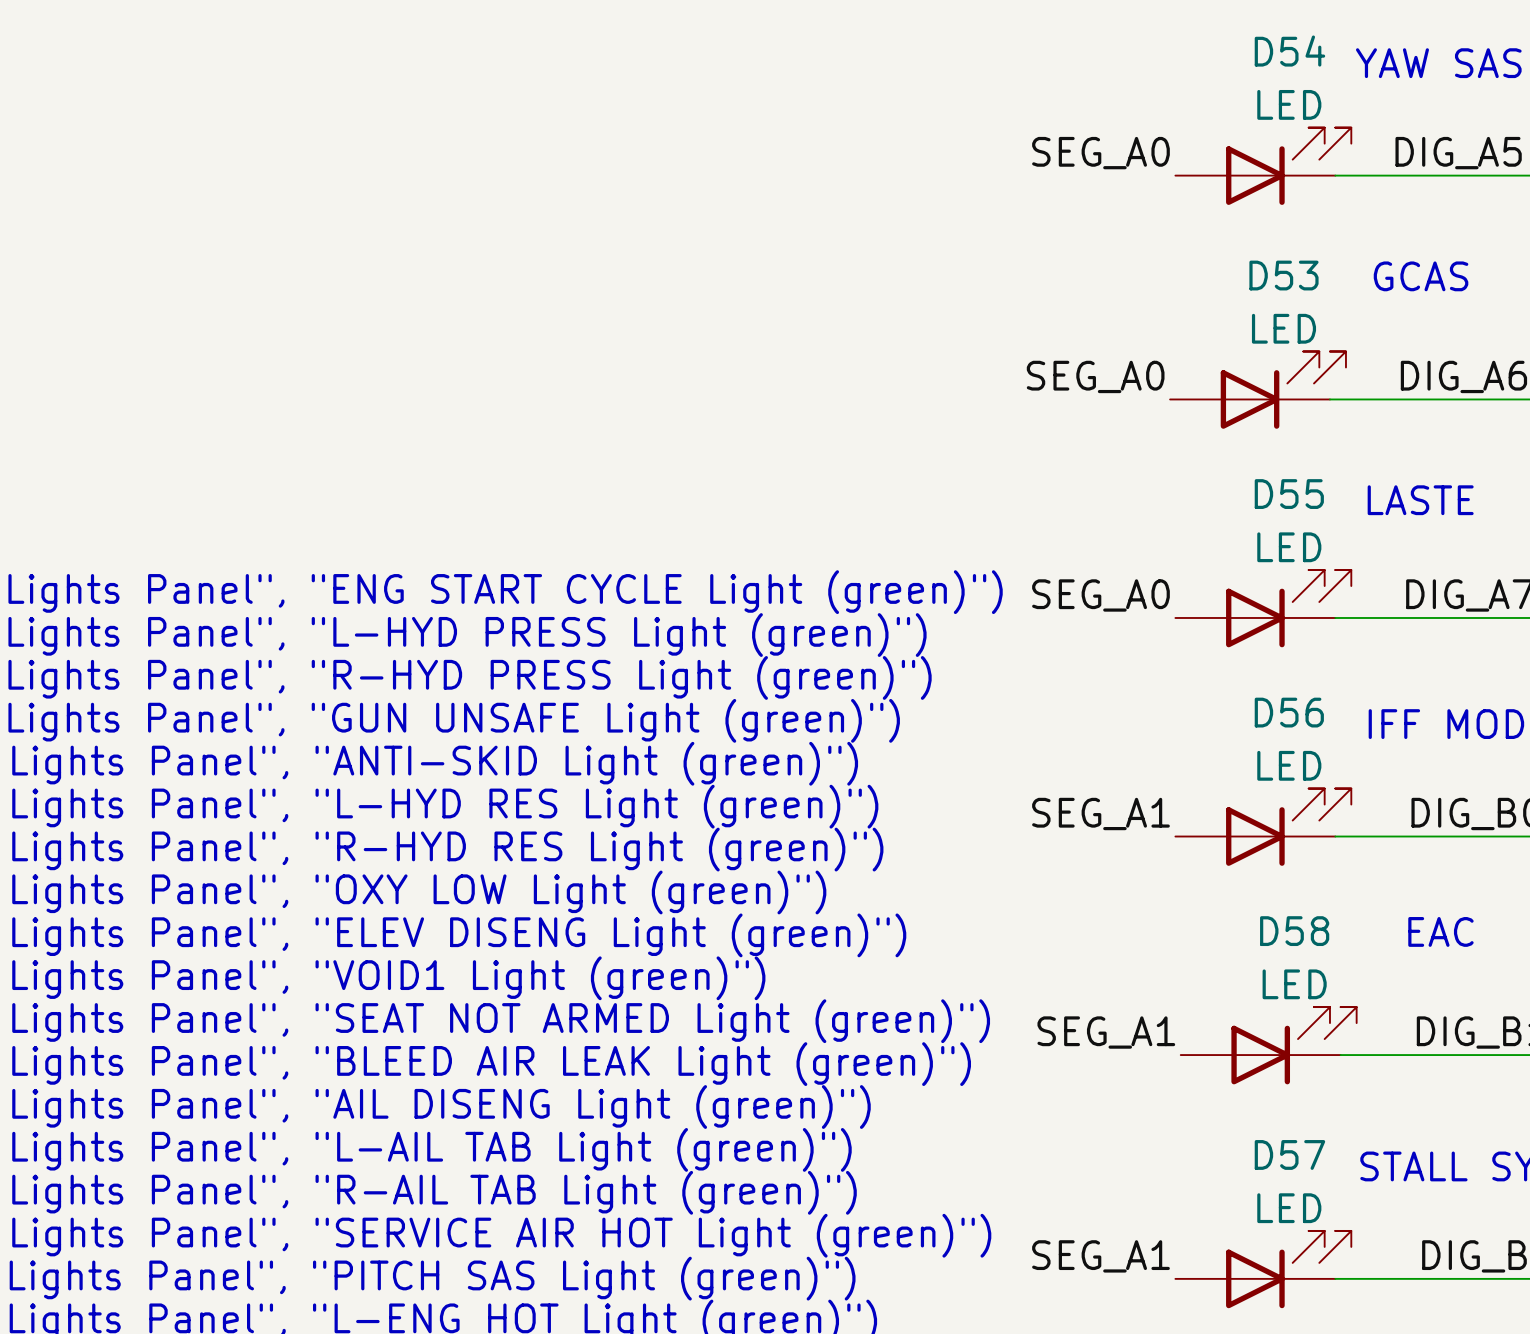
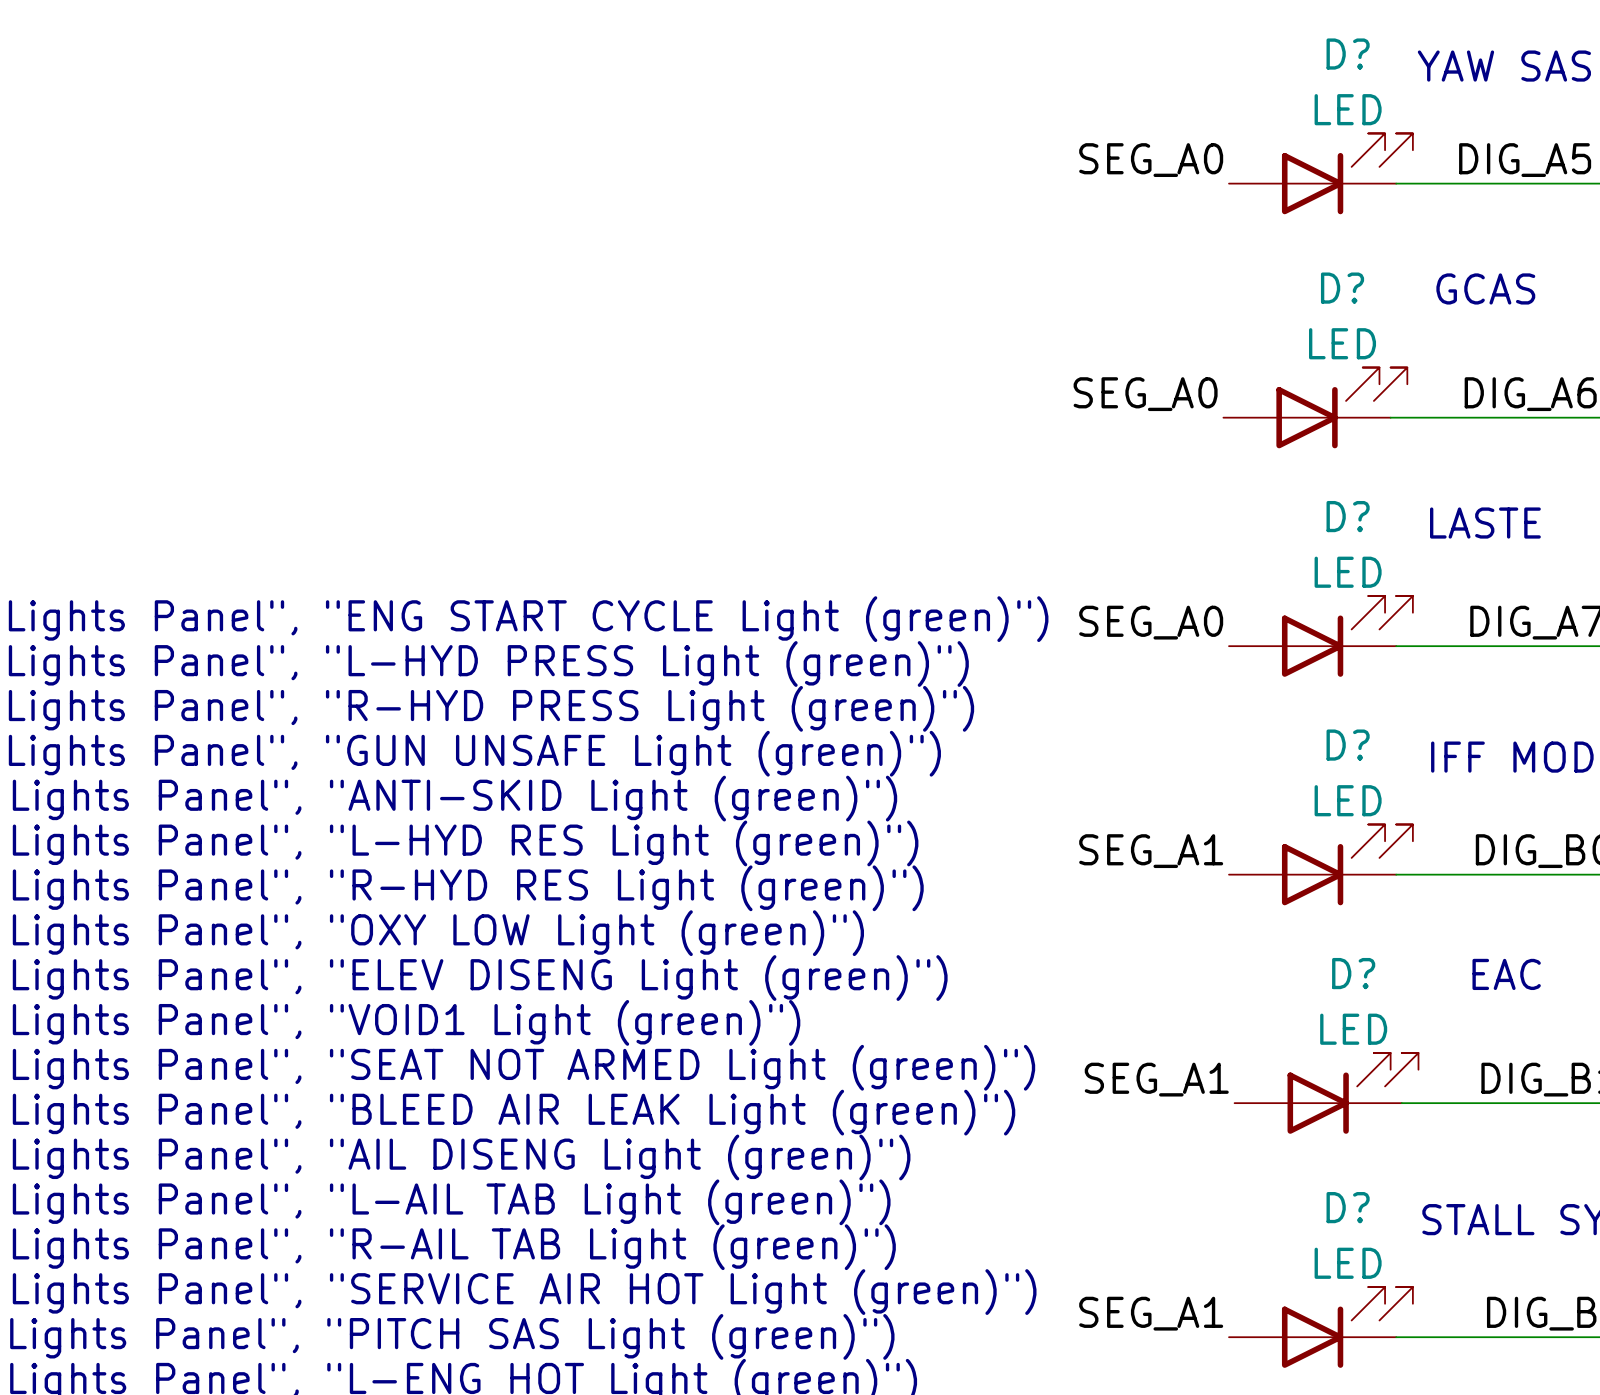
D54 name: D54 (1289, 51) -> D? (1348, 54)
D53 name: D53 (1283, 275) -> D? (1342, 288)
D55 name: D55 (1289, 494) -> D? (1348, 516)
D56 name: D56 (1289, 712) -> D? (1348, 745)
D58 name: D58 (1294, 931) -> D? (1353, 973)
D57 name: D57 (1289, 1154) -> D? (1348, 1207)

